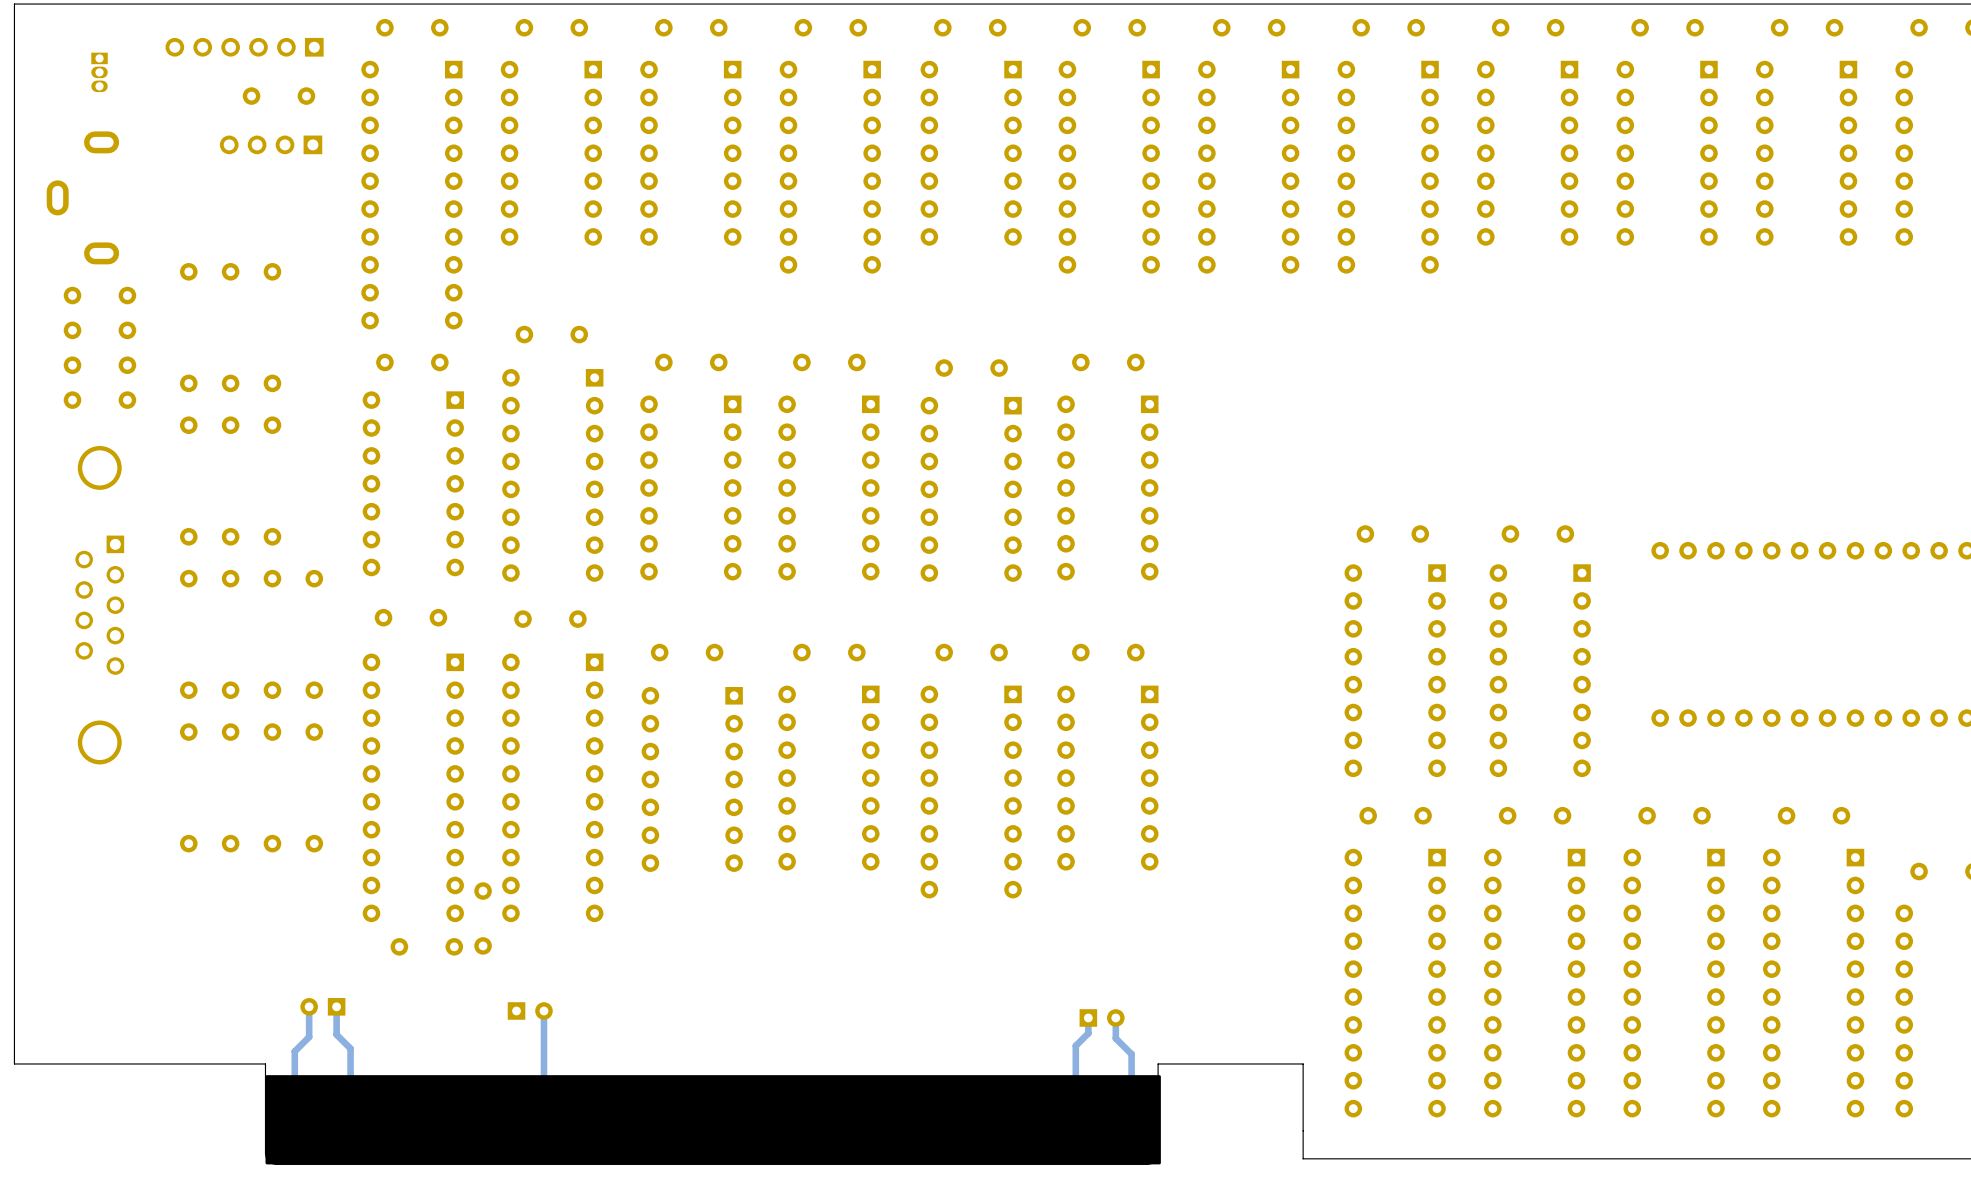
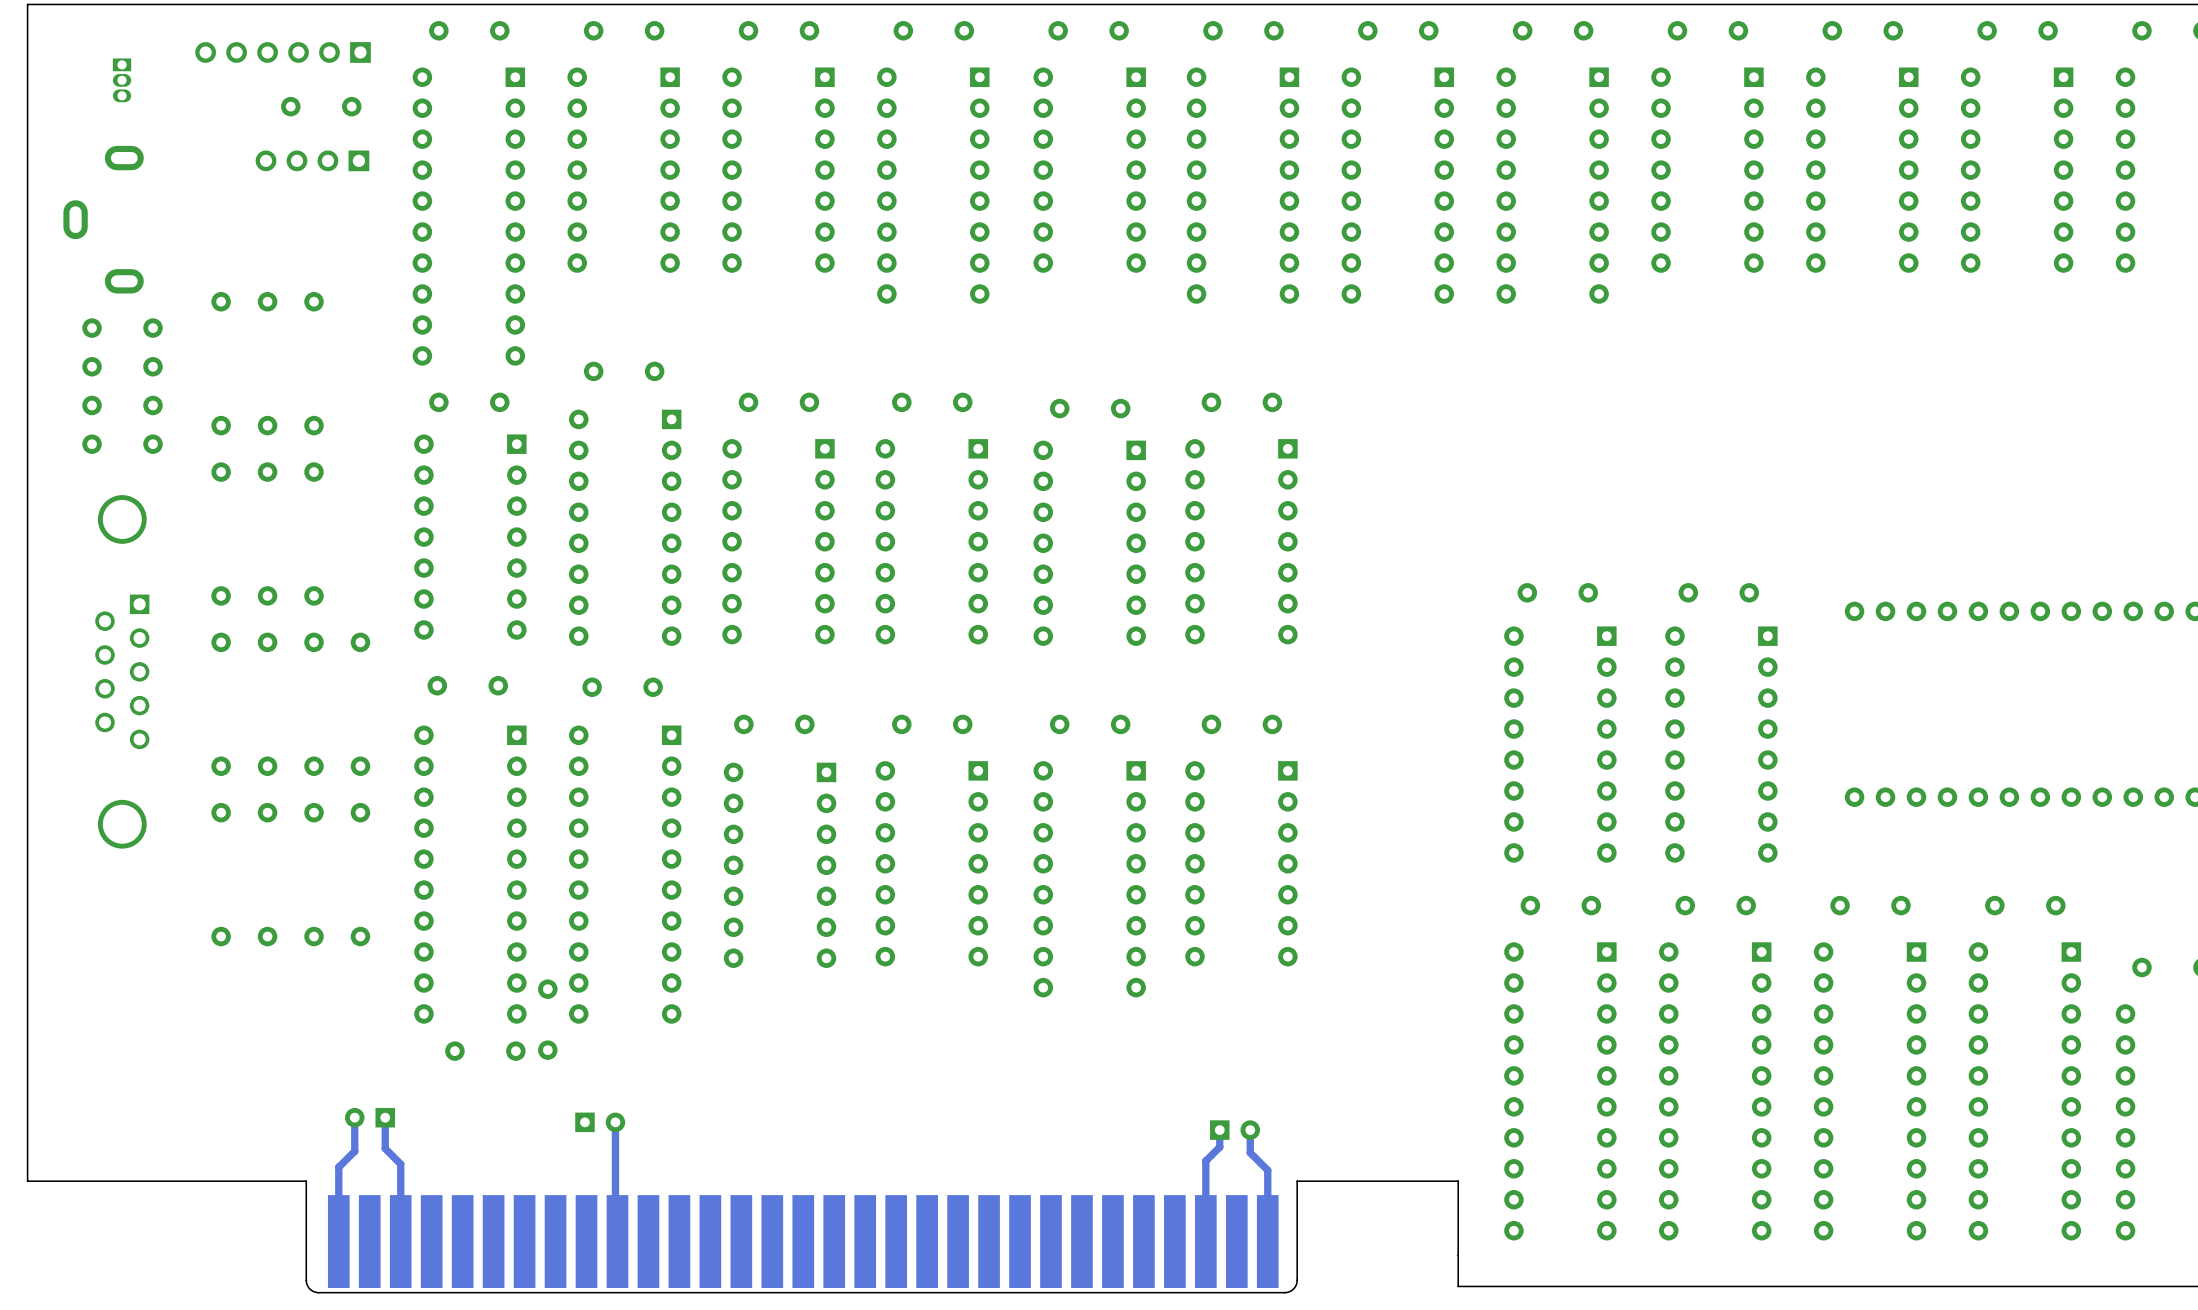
drawing: [265, 1075, 1161, 1165] -> none

